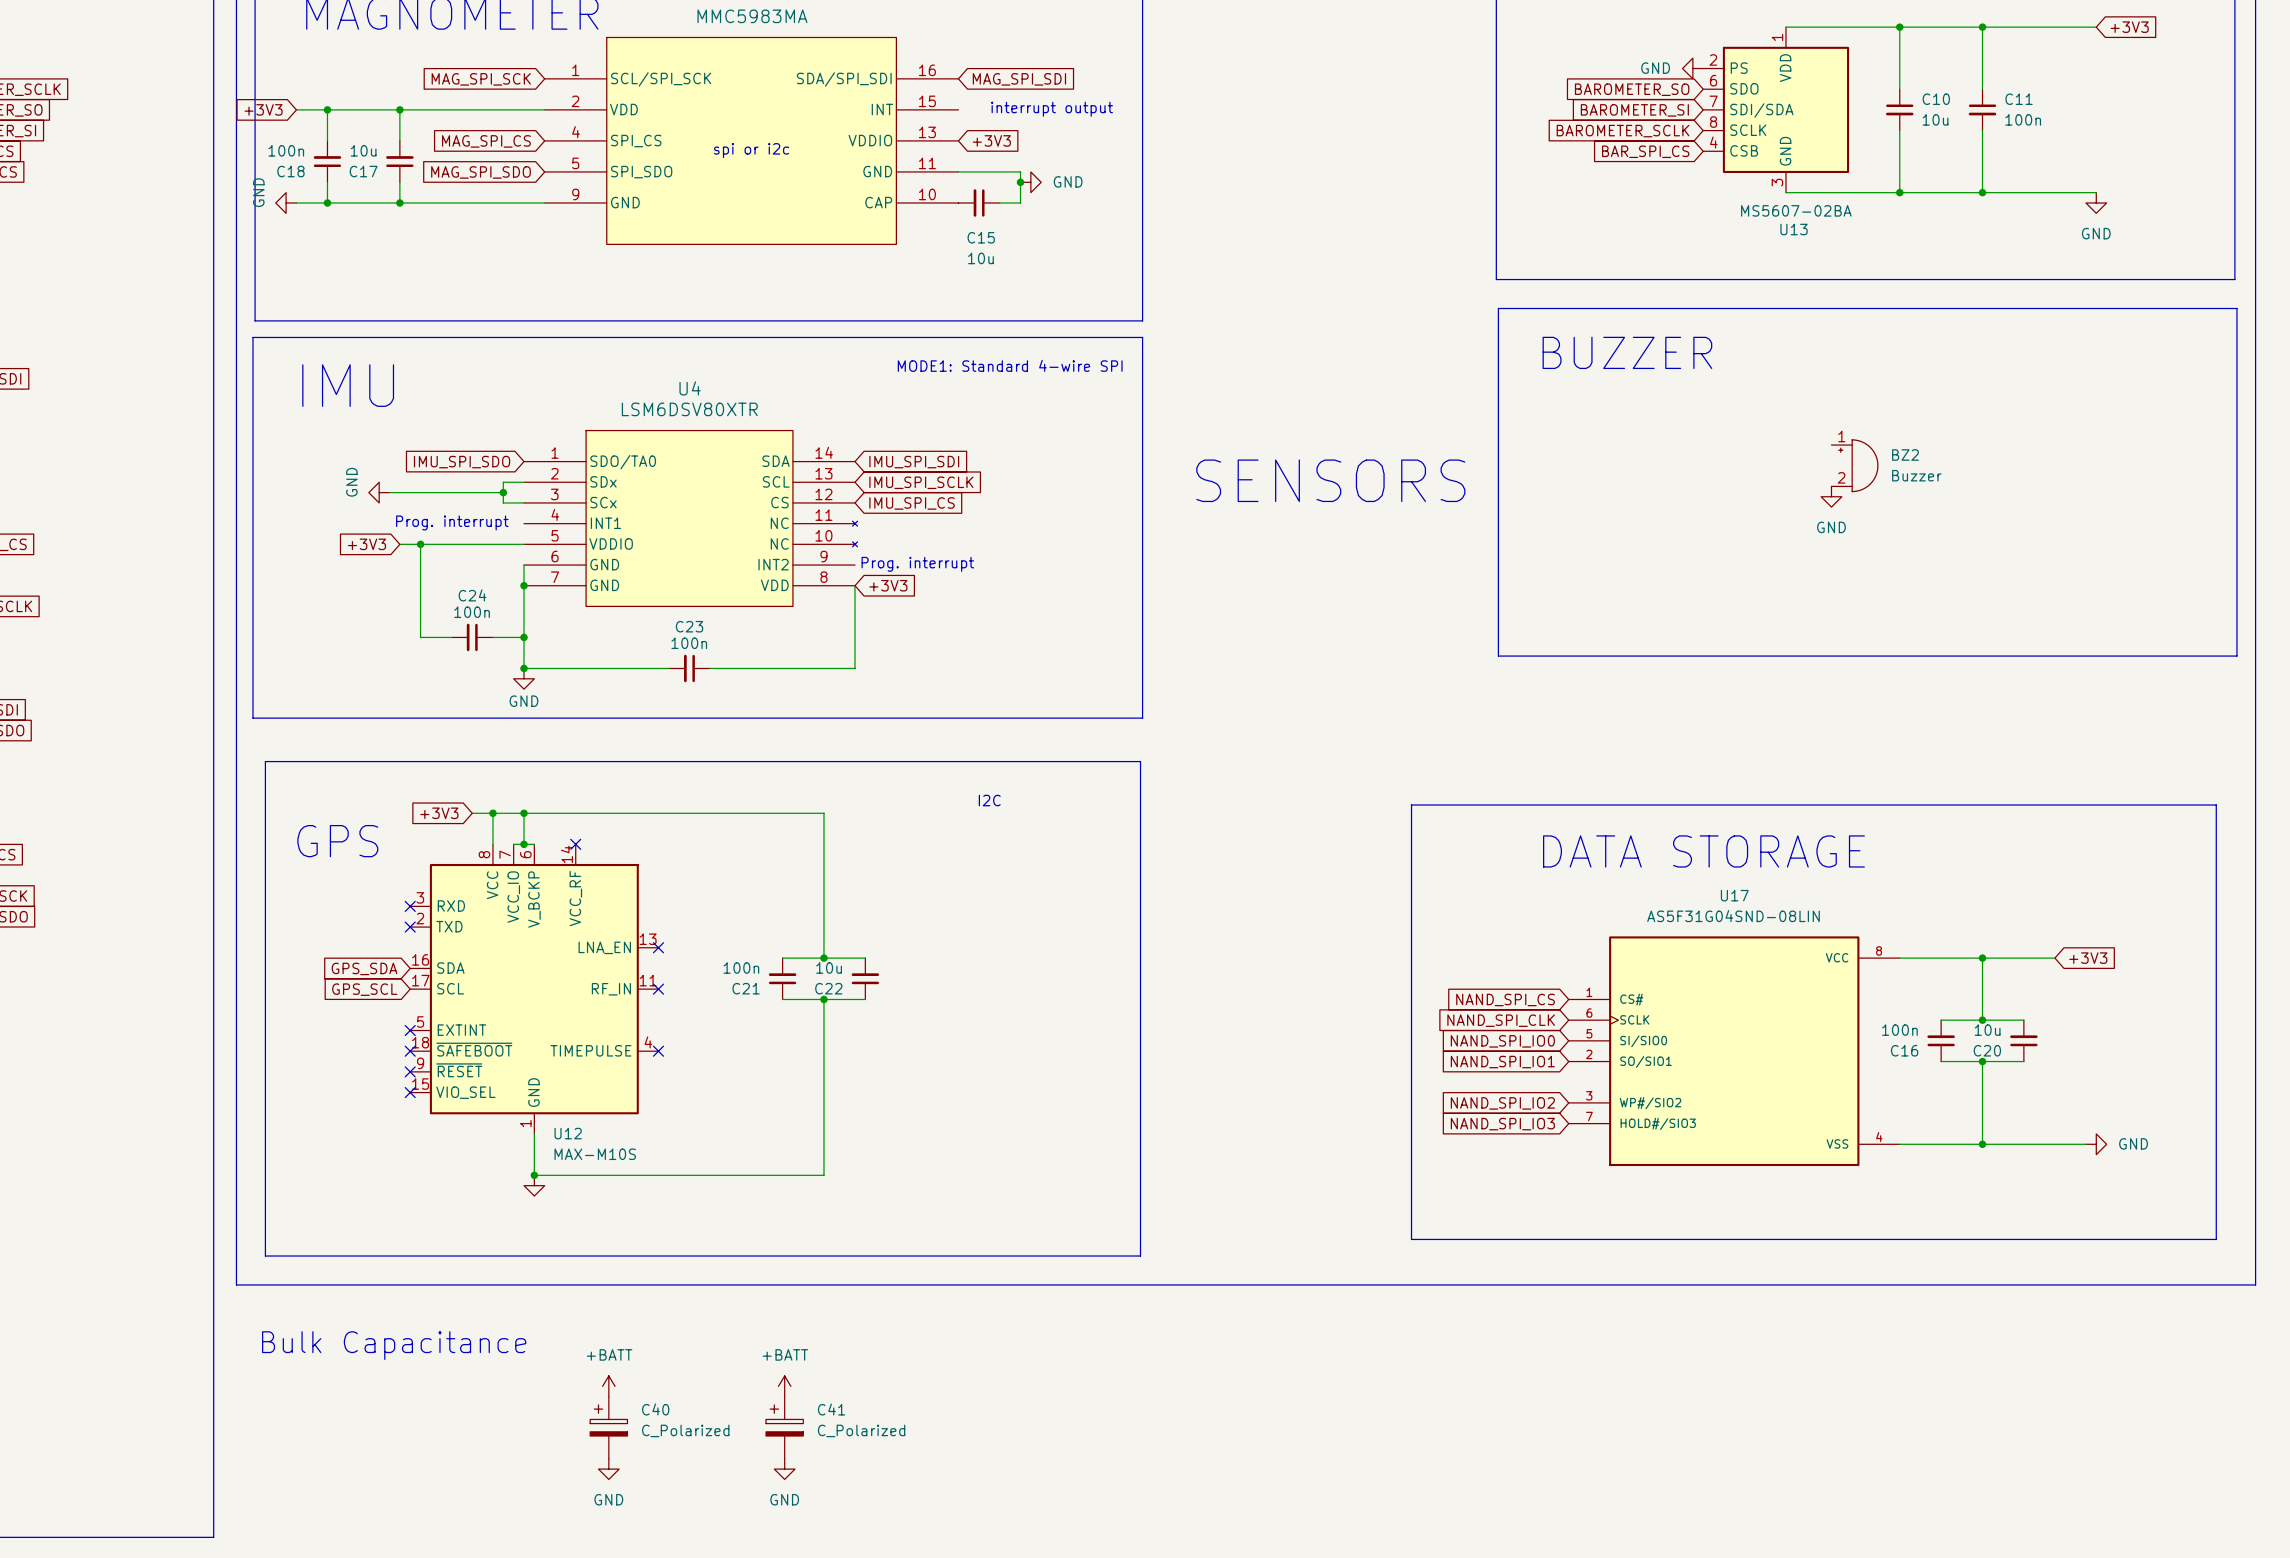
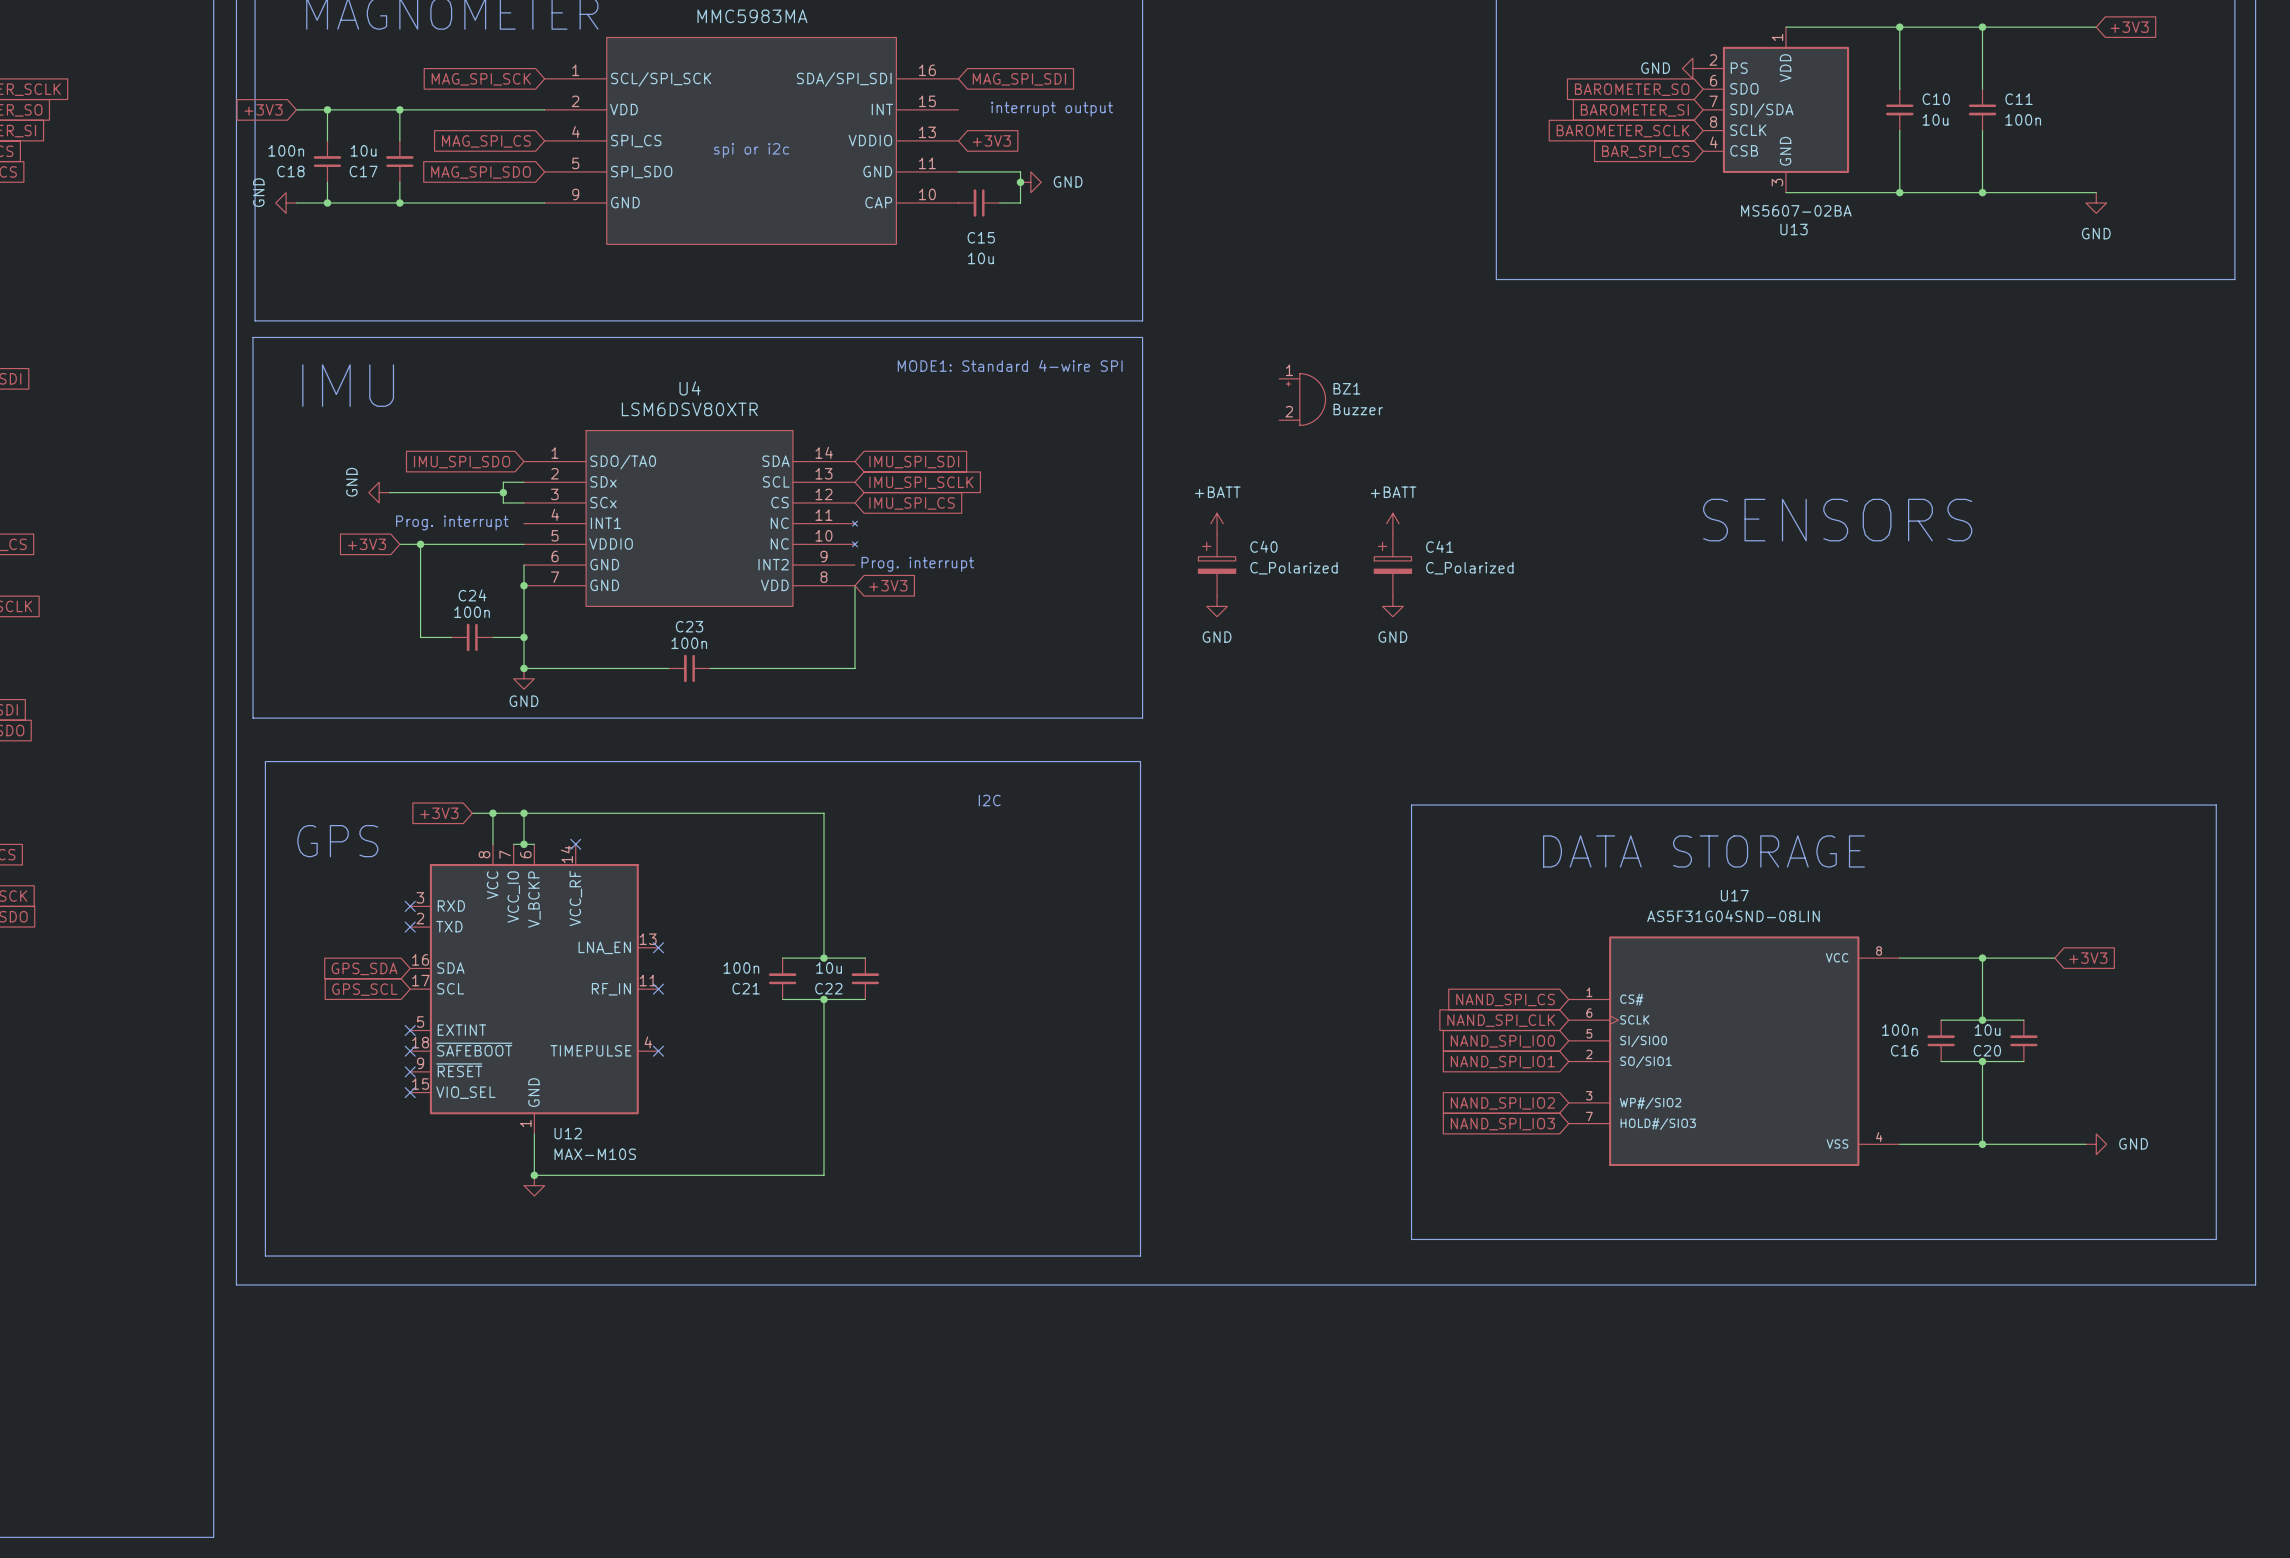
line: (1498, 308) (2236, 308) (2236, 656) (1498, 656) (1498, 308) -> none
text: BUZZER (1627, 352) -> none
BZ1: none -> Buzzer (1302, 399)
BZ2: Buzzer (1854, 465) -> none
text: SENSORS (1330, 480) -> none
power symbol: GND (1831, 496) -> none
text: none -> SENSORS (1837, 520)
power symbol: none -> +BATT (1217, 523)
power symbol: none -> +BATT (1392, 523)
power symbol: none -> GND (1217, 606)
power symbol: none -> GND (1392, 606)
text: Bulk Capacitance (394, 1345) -> none
power symbol: +BATT (608, 1386) -> none
power symbol: +BATT (784, 1386) -> none
C40 position: (608, 1427) -> (1217, 565)
C41 position: (784, 1427) -> (1392, 565)
power symbol: GND (608, 1469) -> none
power symbol: GND (784, 1469) -> none

